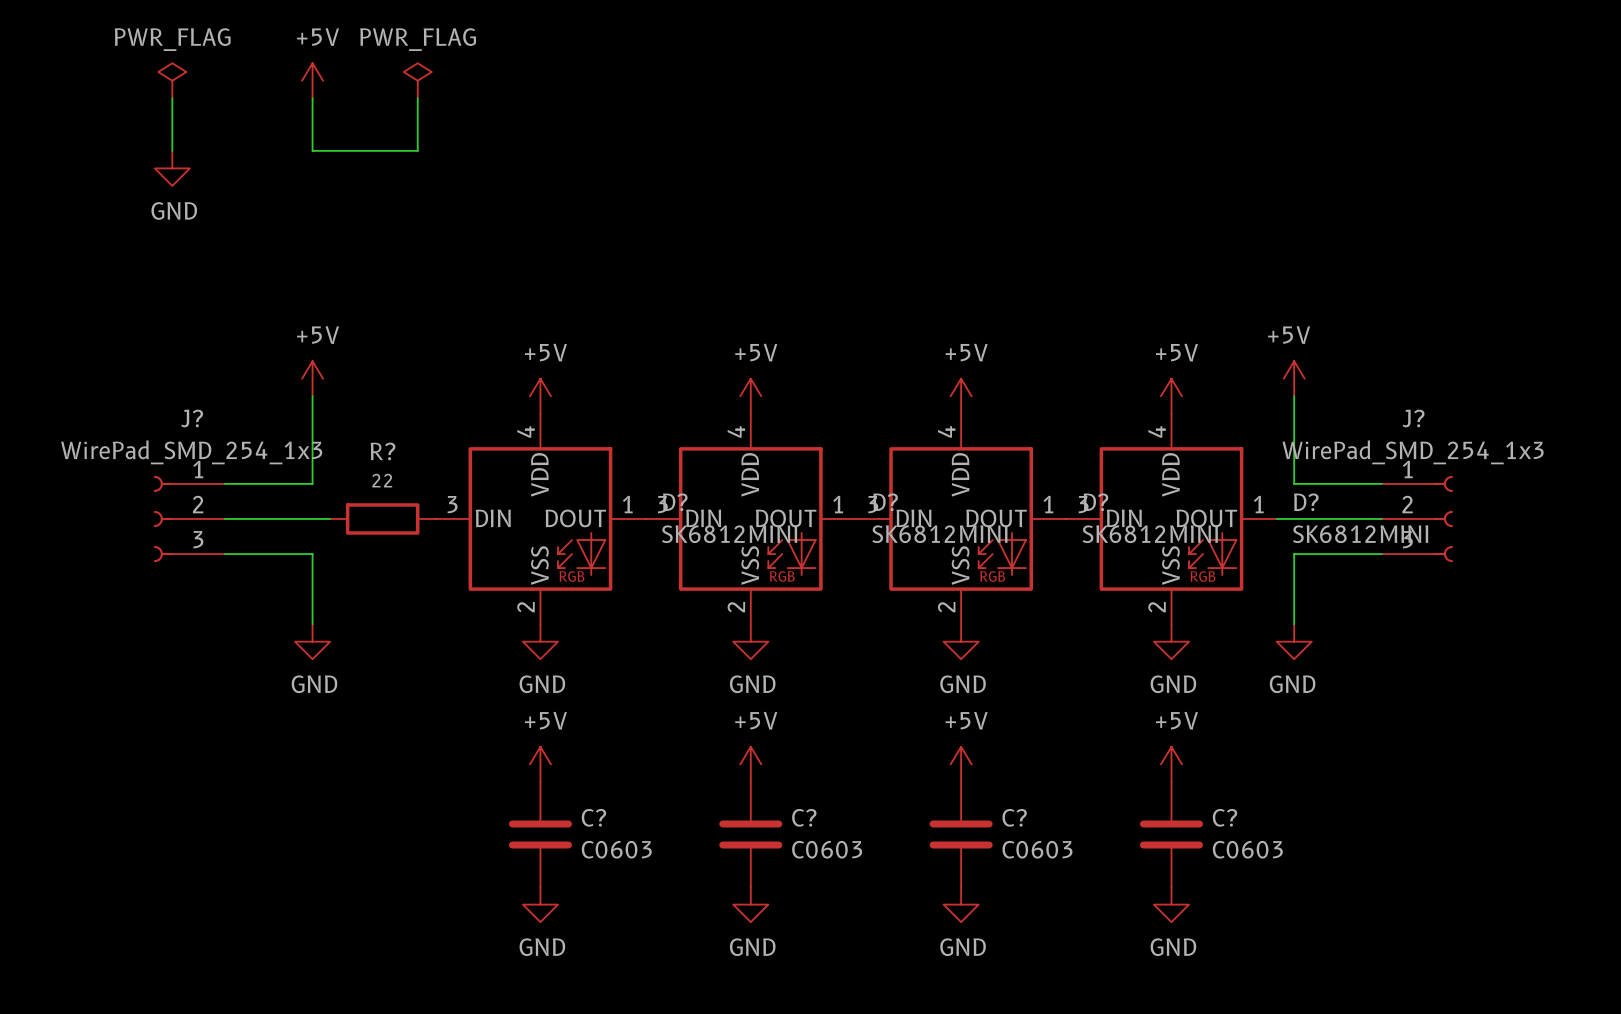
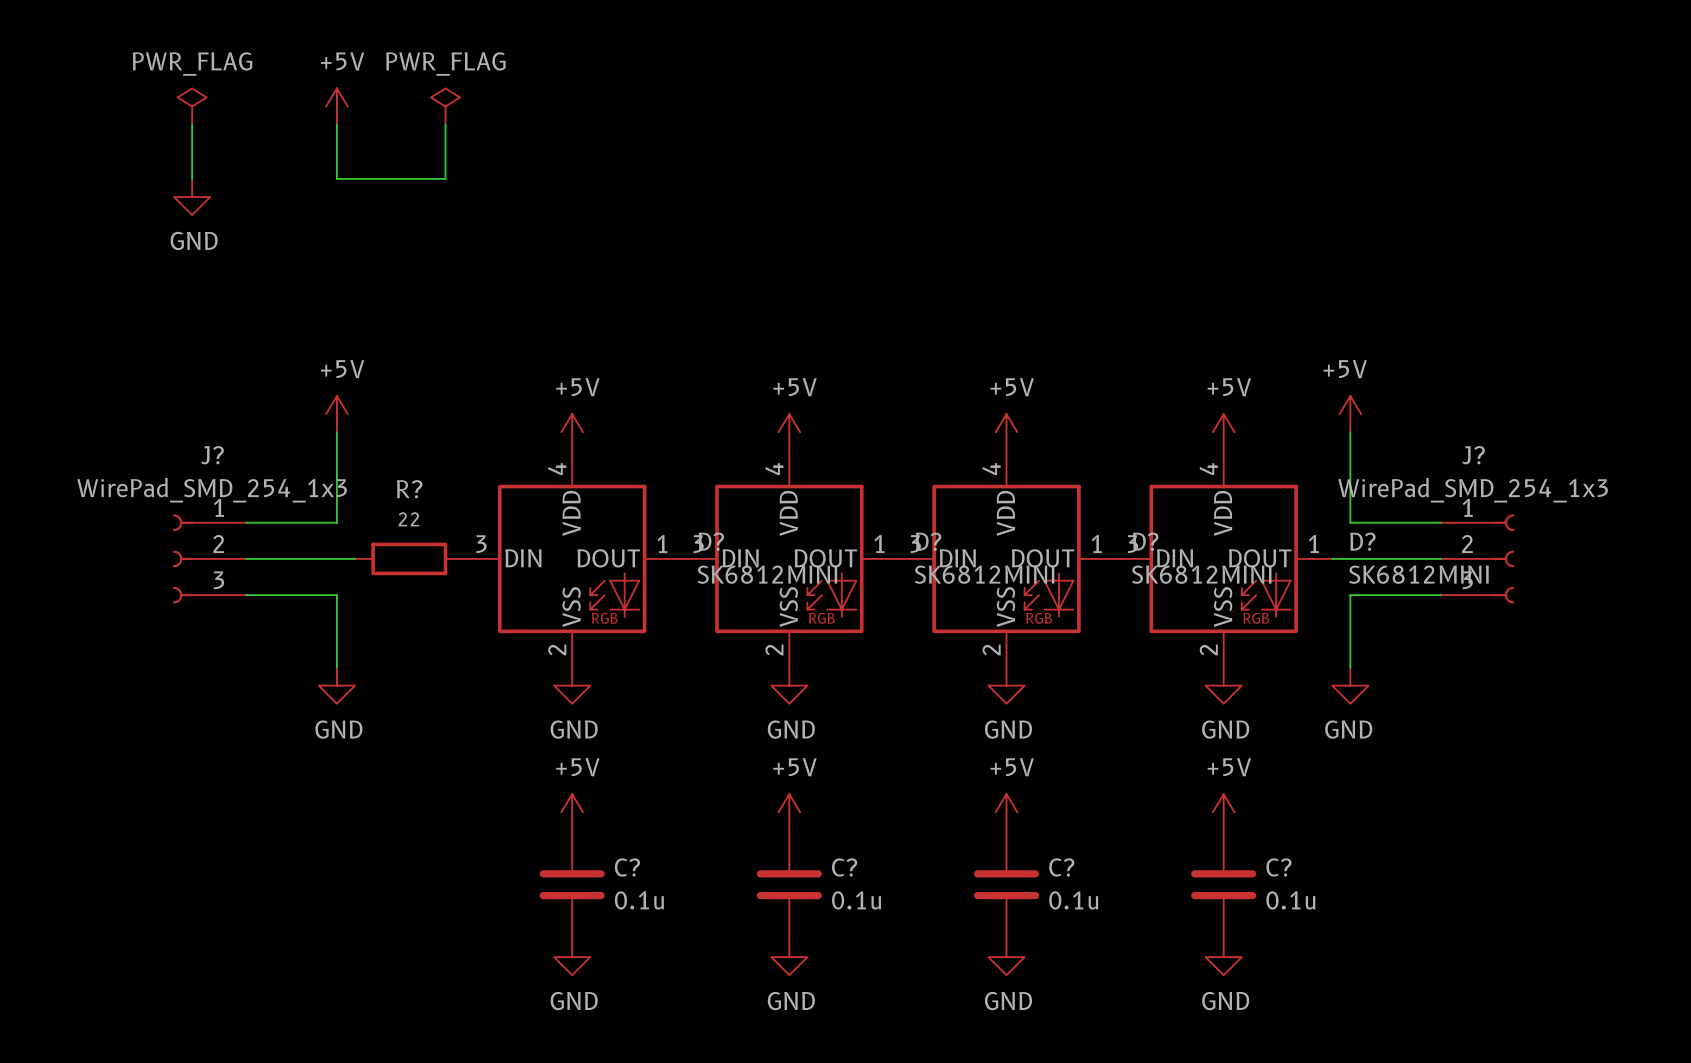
C? value: C0603 (616, 849) -> 0.1u (639, 900)
C? value: C0603 (827, 849) -> 0.1u (856, 900)
C? value: C0603 (1037, 849) -> 0.1u (1073, 900)
C? value: C0603 (1247, 849) -> 0.1u (1290, 900)

